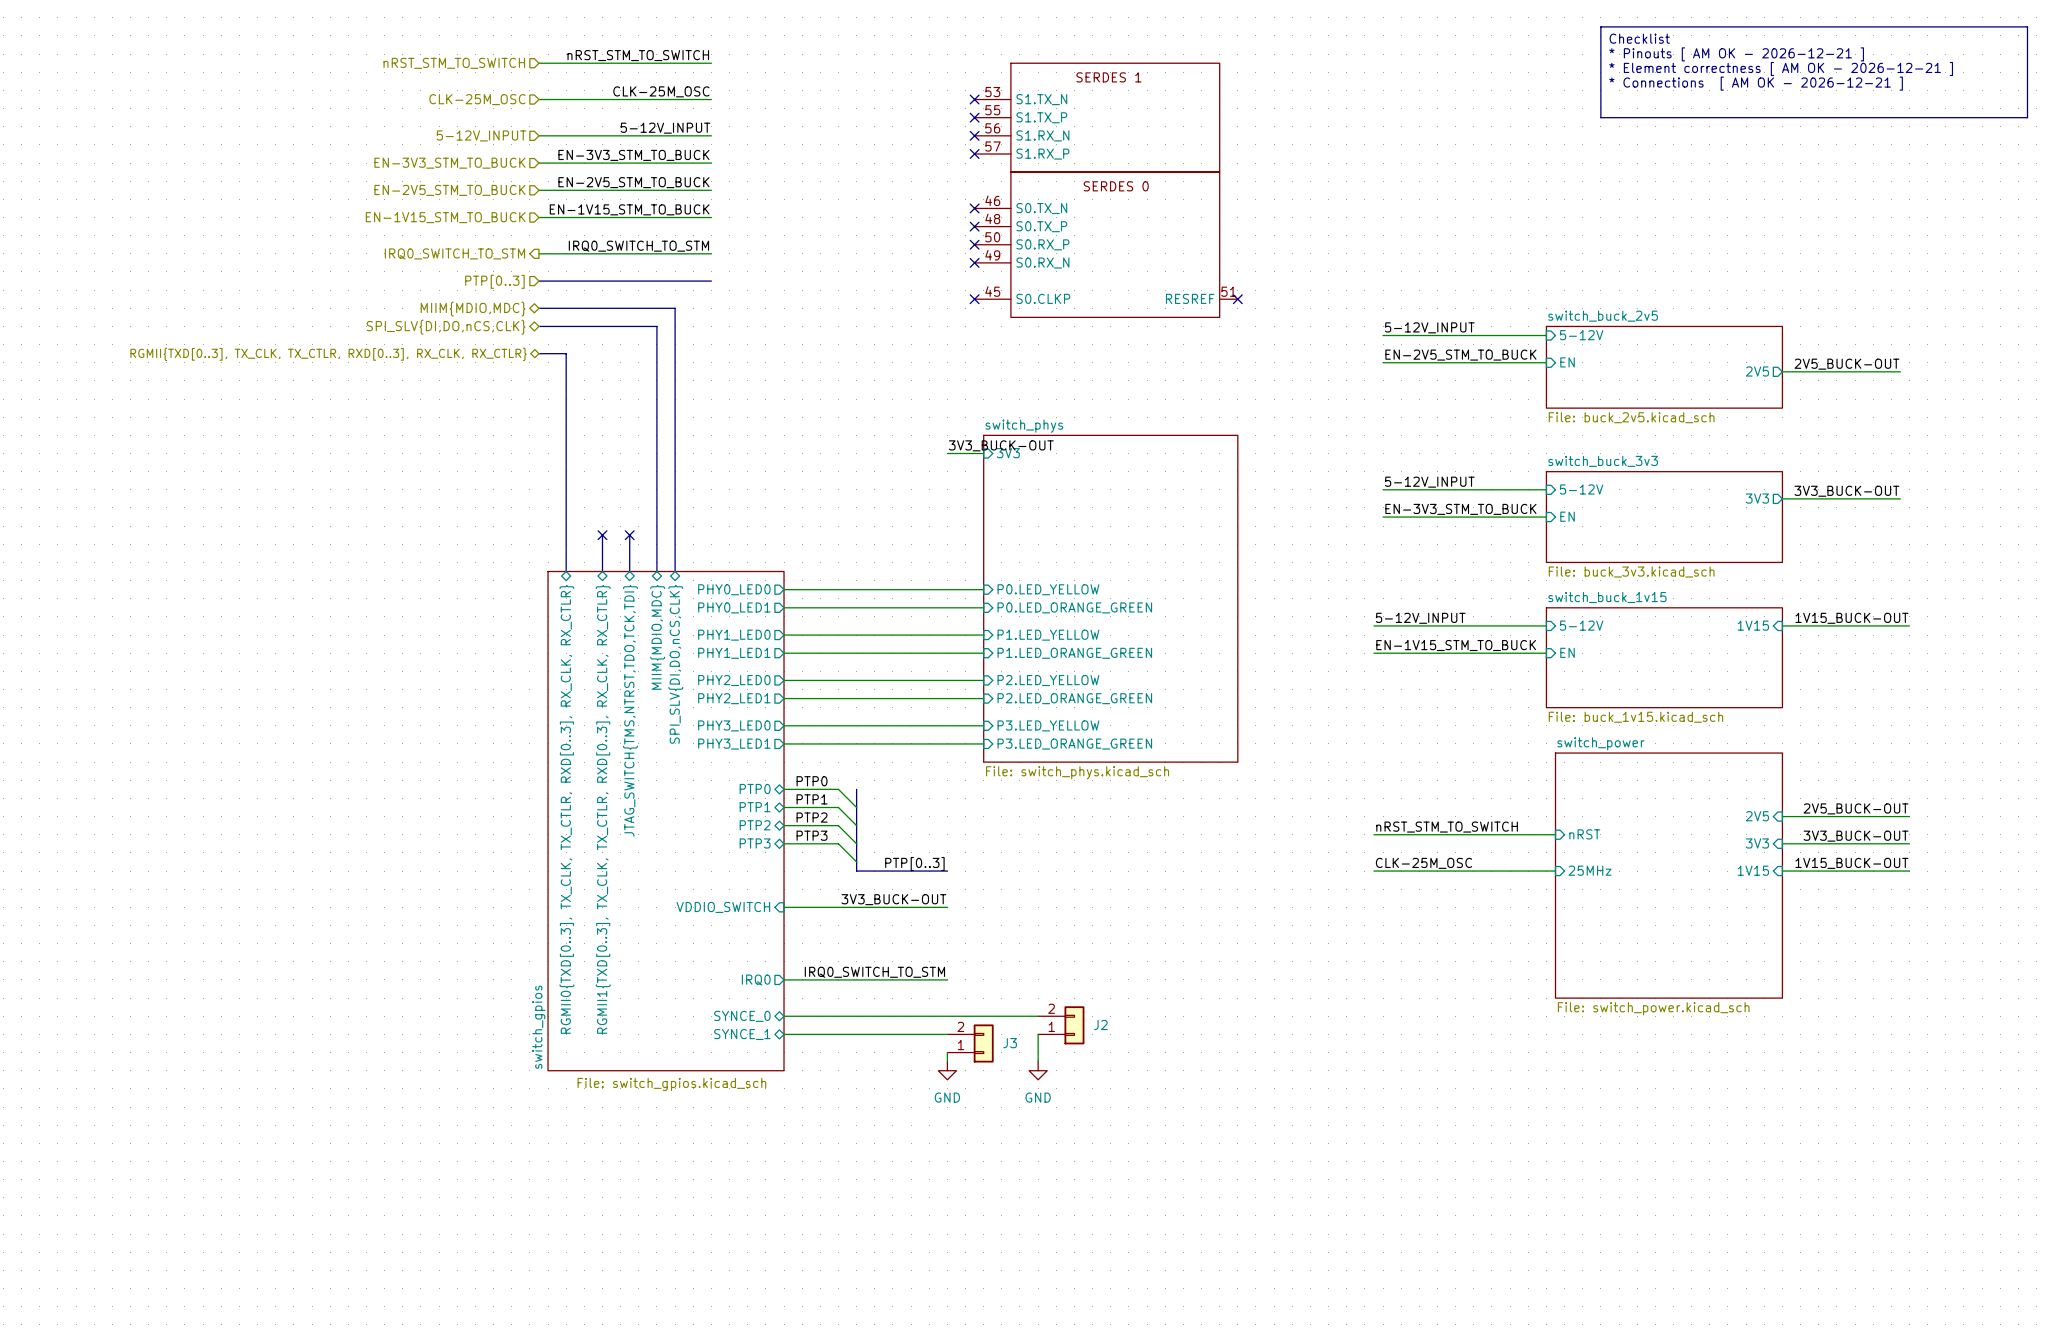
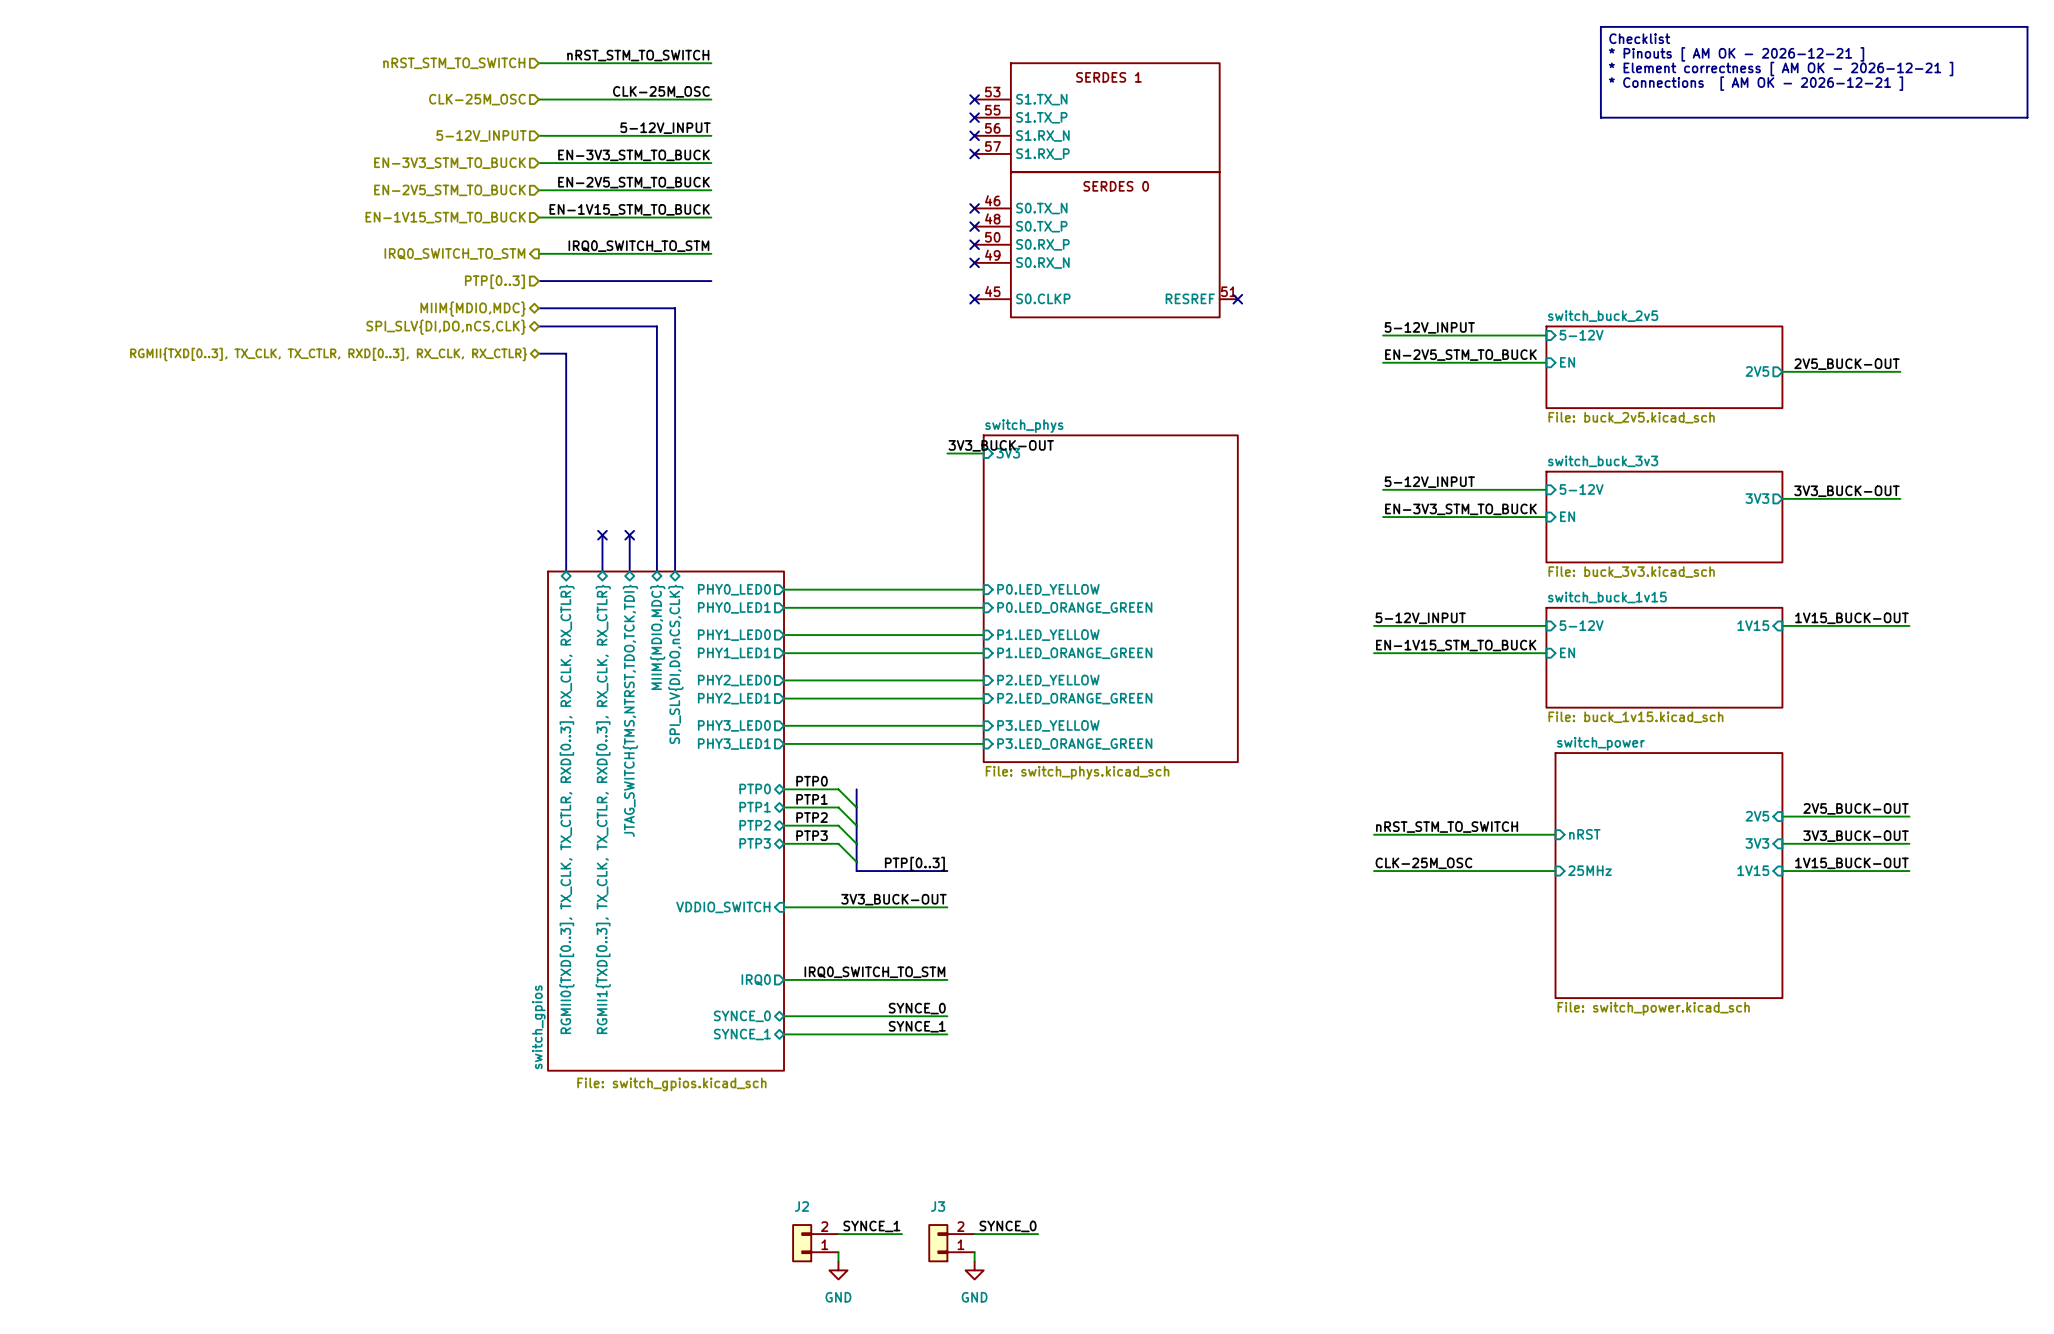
label: none -> SYNCE_0 (917, 1008)
wire: (947, 1016) (1038, 1016) -> none
J2 name position: J2 (1100, 1024) -> J2 (801, 1206)
J2 position: (1061, 1025) -> (815, 1243)
J2 flip: as is (1074, 1025) -> left-right (802, 1243)
label: none -> SYNCE_1 (917, 1026)
wire: (1038, 1034) (1038, 1061) -> none
J3 position: (970, 1043) -> (951, 1243)
J3 flip: as is (983, 1043) -> left-right (938, 1243)
J3 name position: J3 (1010, 1043) -> J3 (938, 1206)
wire: (947, 1052) (947, 1061) -> none
power symbol: GND (947, 1070) -> none
power symbol: GND (1038, 1070) -> none
label: none -> SYNCE_1 (871, 1226)
label: none -> SYNCE_0 (1008, 1226)
wire: none -> (838, 1234) (902, 1234)
wire: none -> (974, 1234) (1038, 1234)
wire: none -> (838, 1252) (838, 1261)
wire: none -> (974, 1252) (974, 1261)
power symbol: none -> GND (838, 1270)
power symbol: none -> GND (974, 1270)

